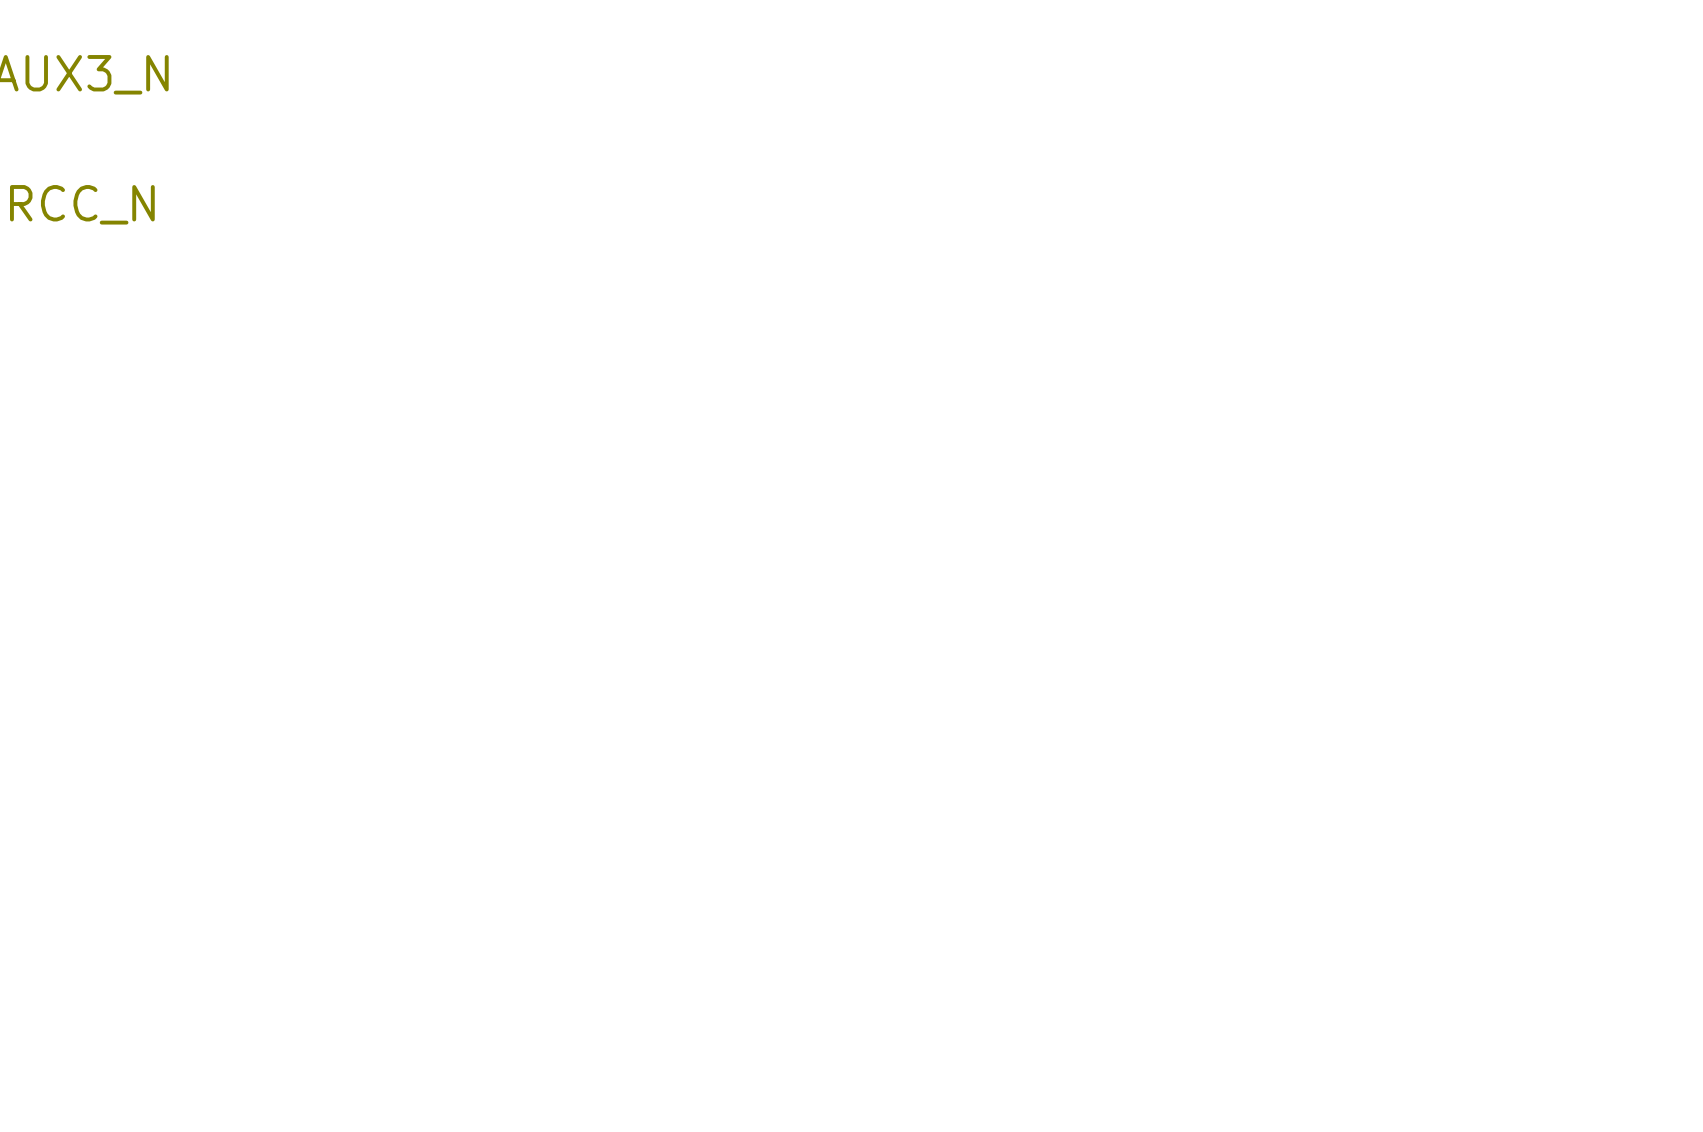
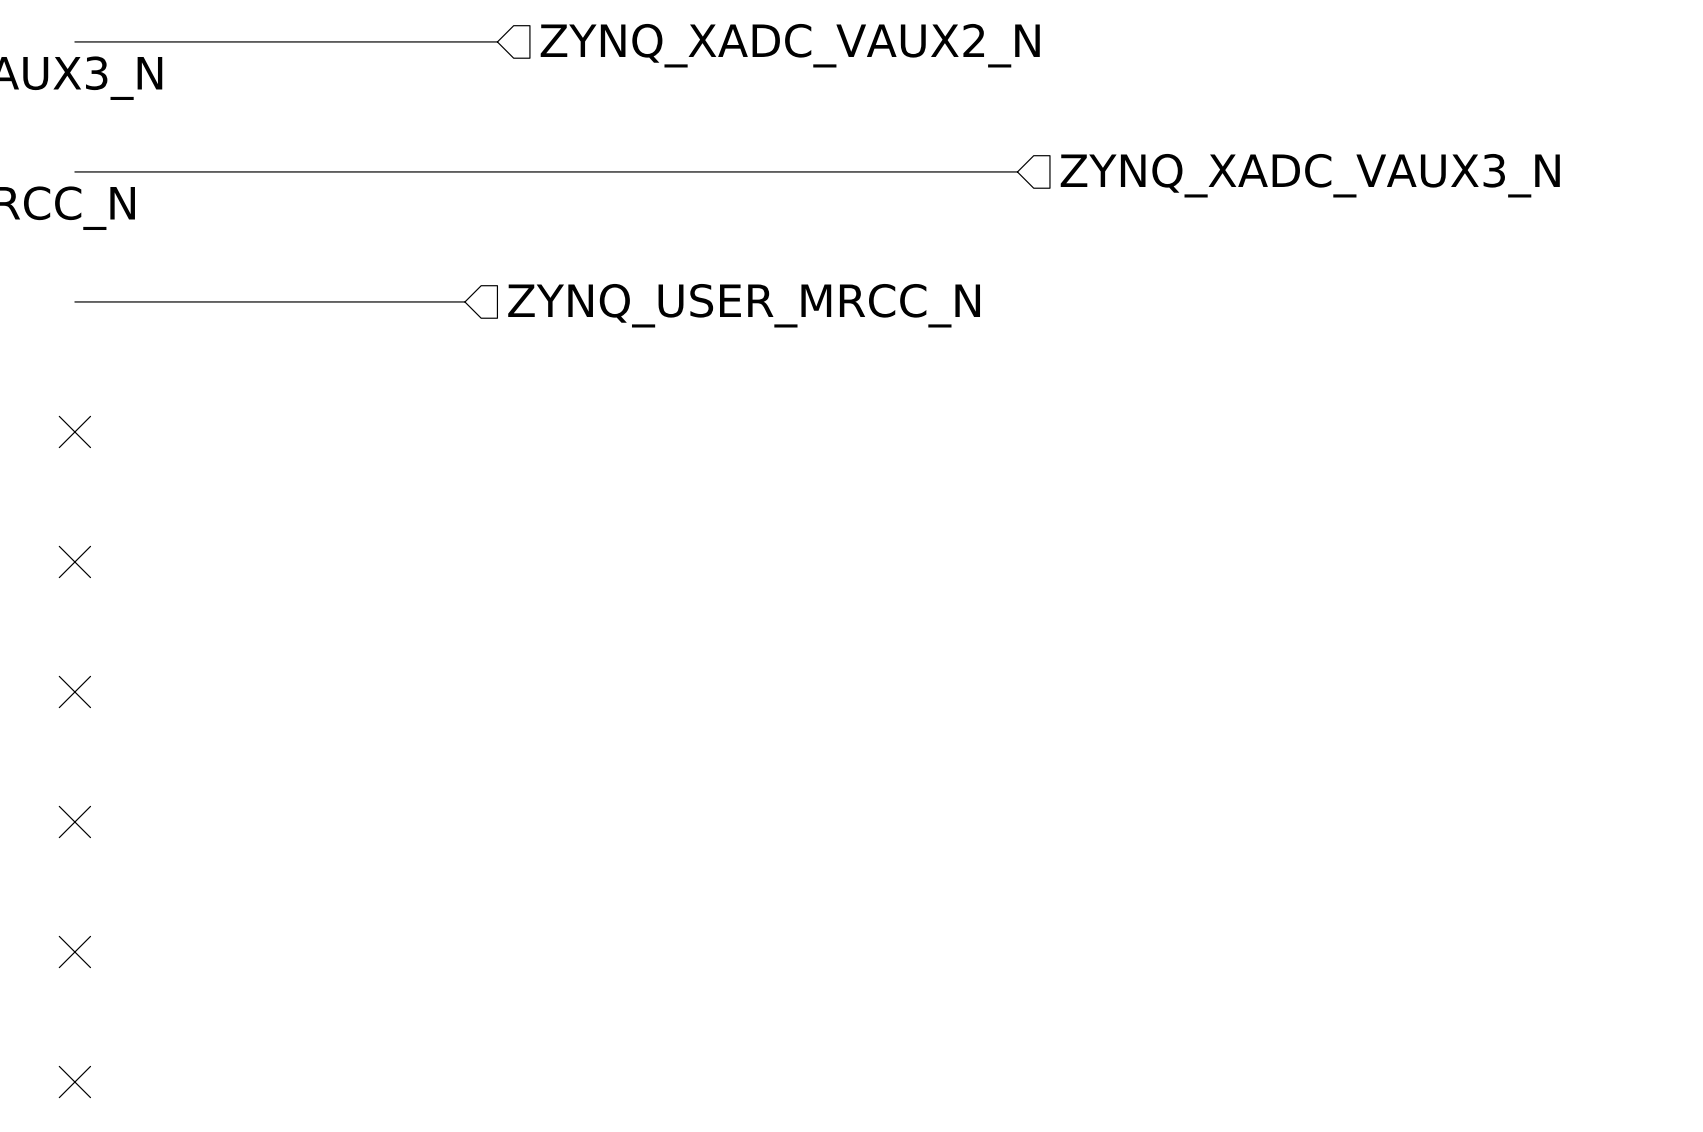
wire: none -> (74, 41) (497, 41)
hierarchical label: none -> ZYNQ_XADC_VAUX2_N (790, 45)
wire: none -> (74, 171) (1017, 171)
hierarchical label: none -> ZYNQ_XADC_VAUX3_N (1310, 175)
wire: none -> (74, 301) (464, 301)
hierarchical label: none -> ZYNQ_USER_MRCC_N (744, 305)
no-connect mark: none -> (74, 431)
no-connect mark: none -> (74, 561)
no-connect mark: none -> (74, 691)
no-connect mark: none -> (74, 822)
no-connect mark: none -> (74, 952)
no-connect mark: none -> (74, 1082)

